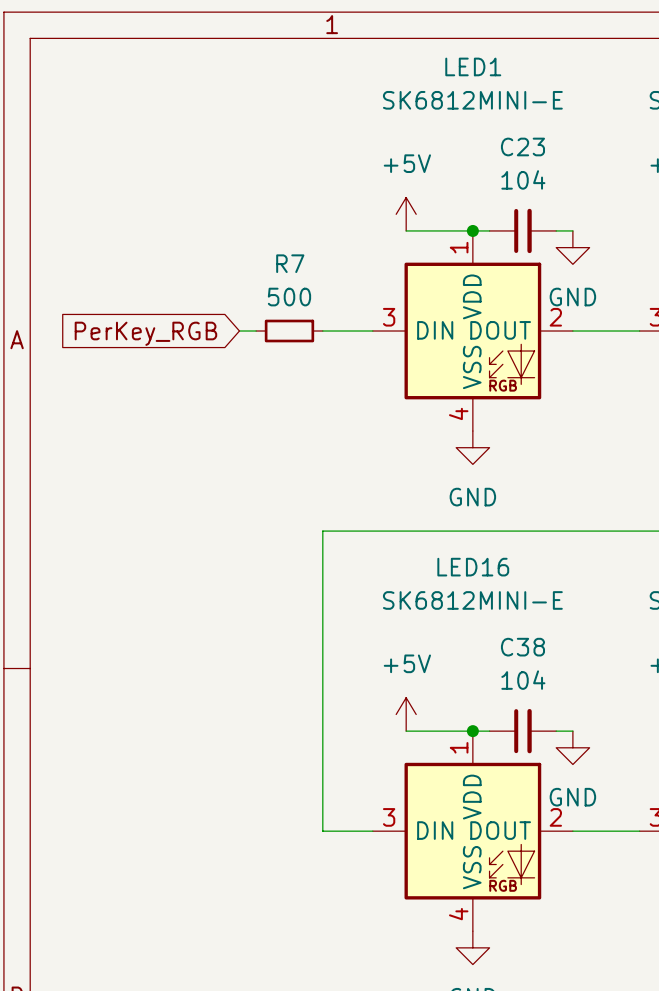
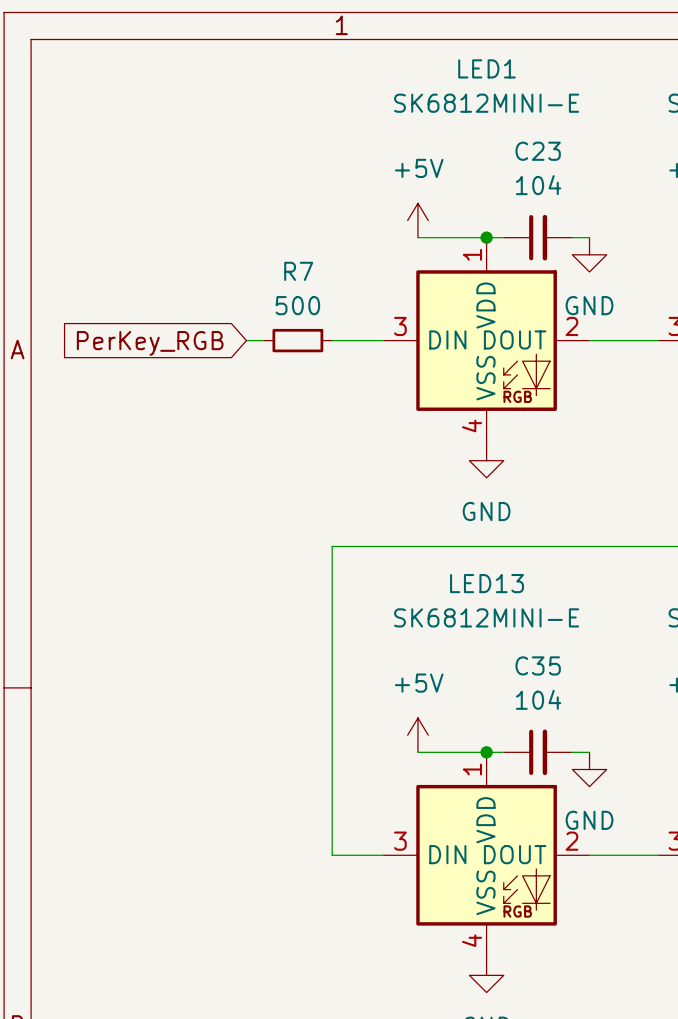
LED16 name: LED16 (473, 567) -> LED13 (487, 583)
C38 name: C38 (522, 647) -> C35 (538, 665)

